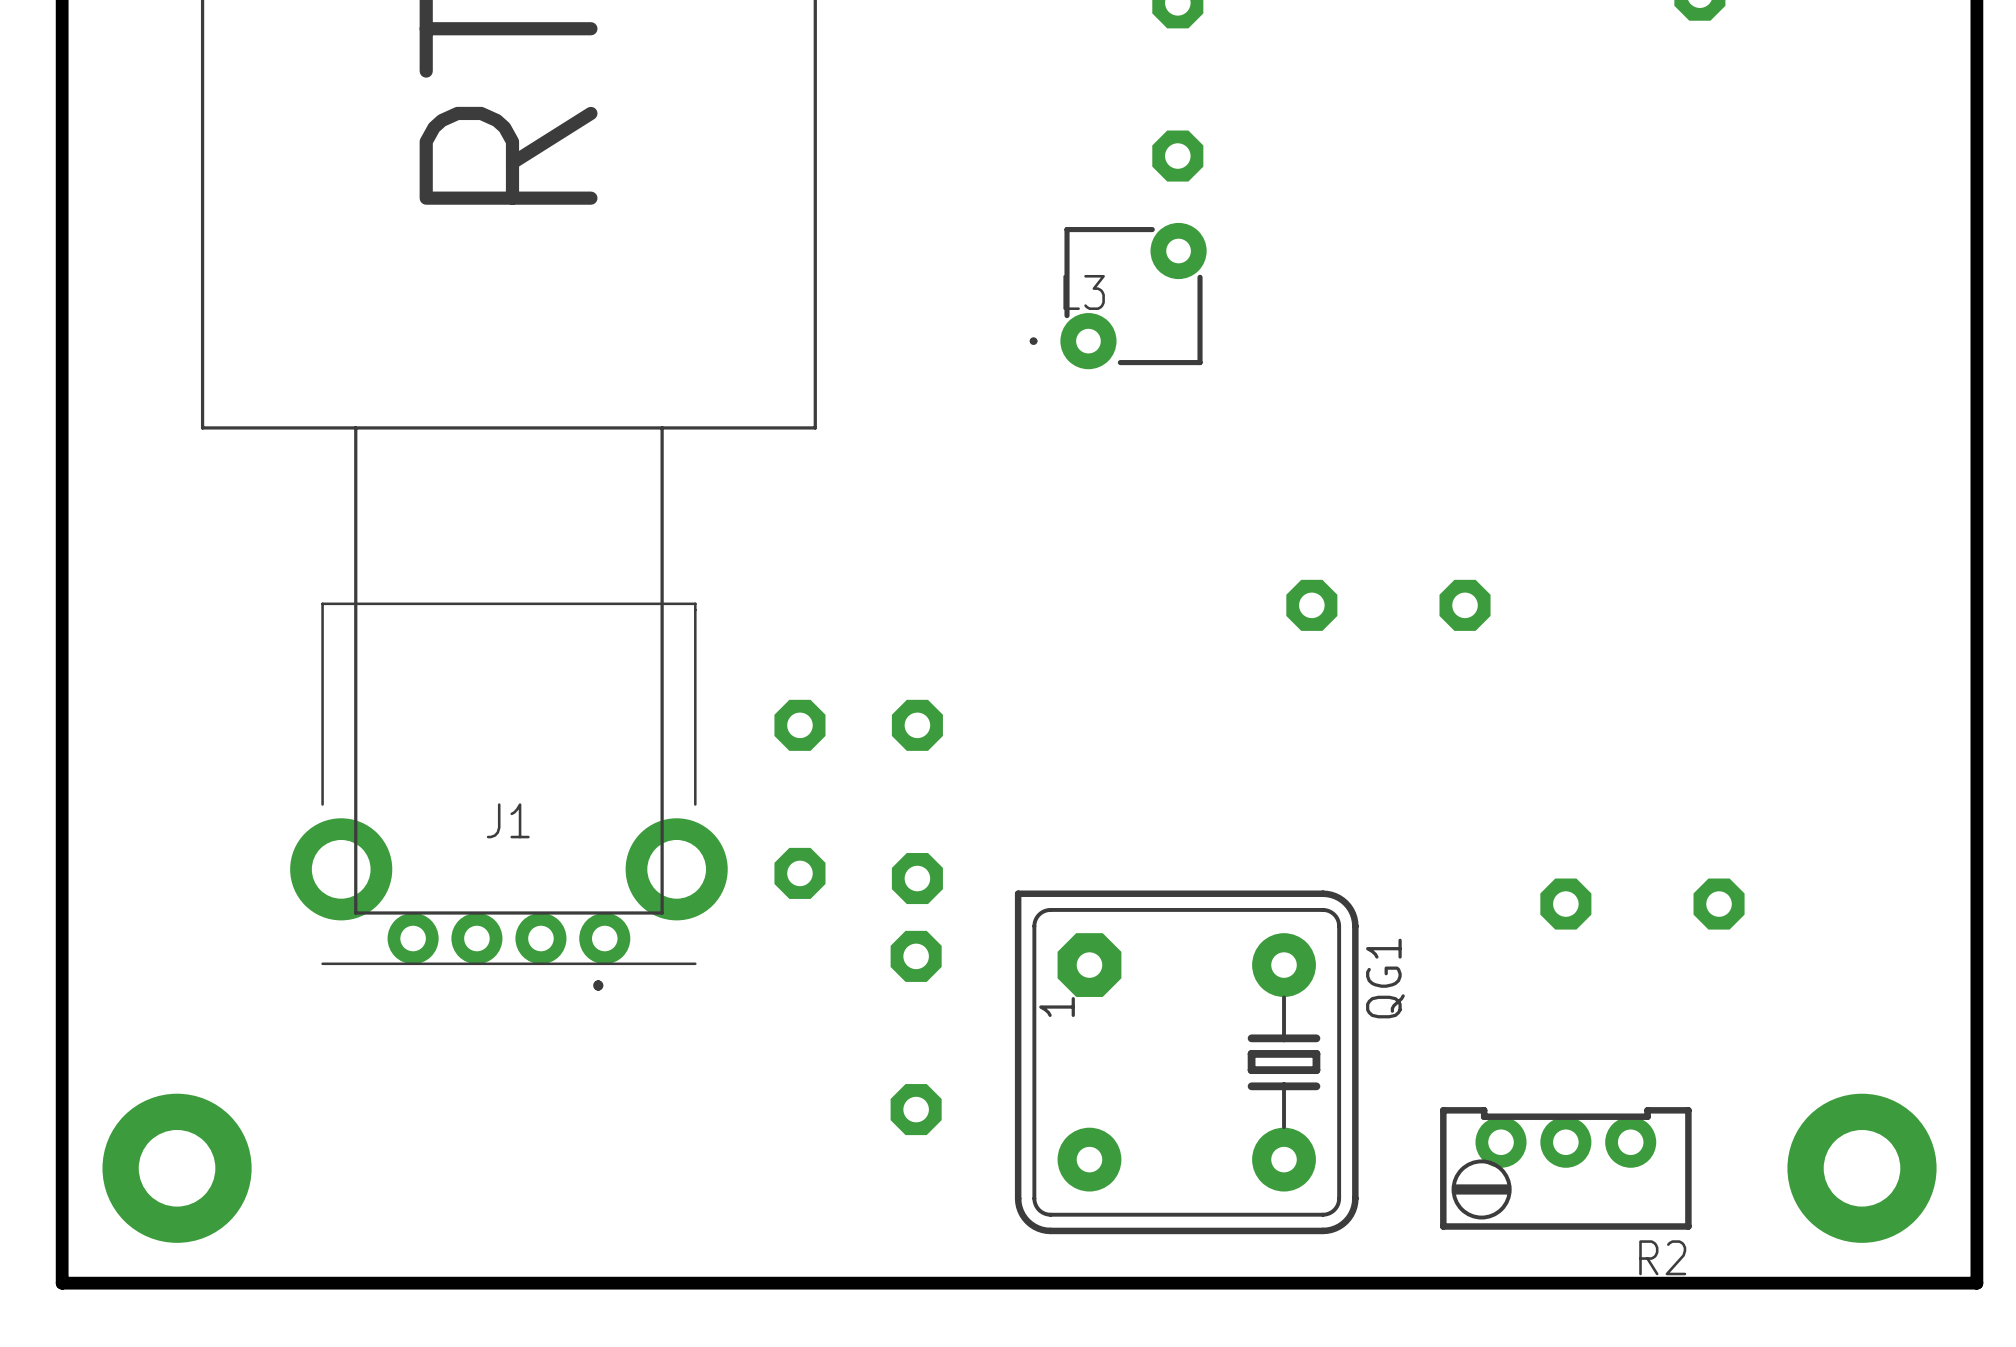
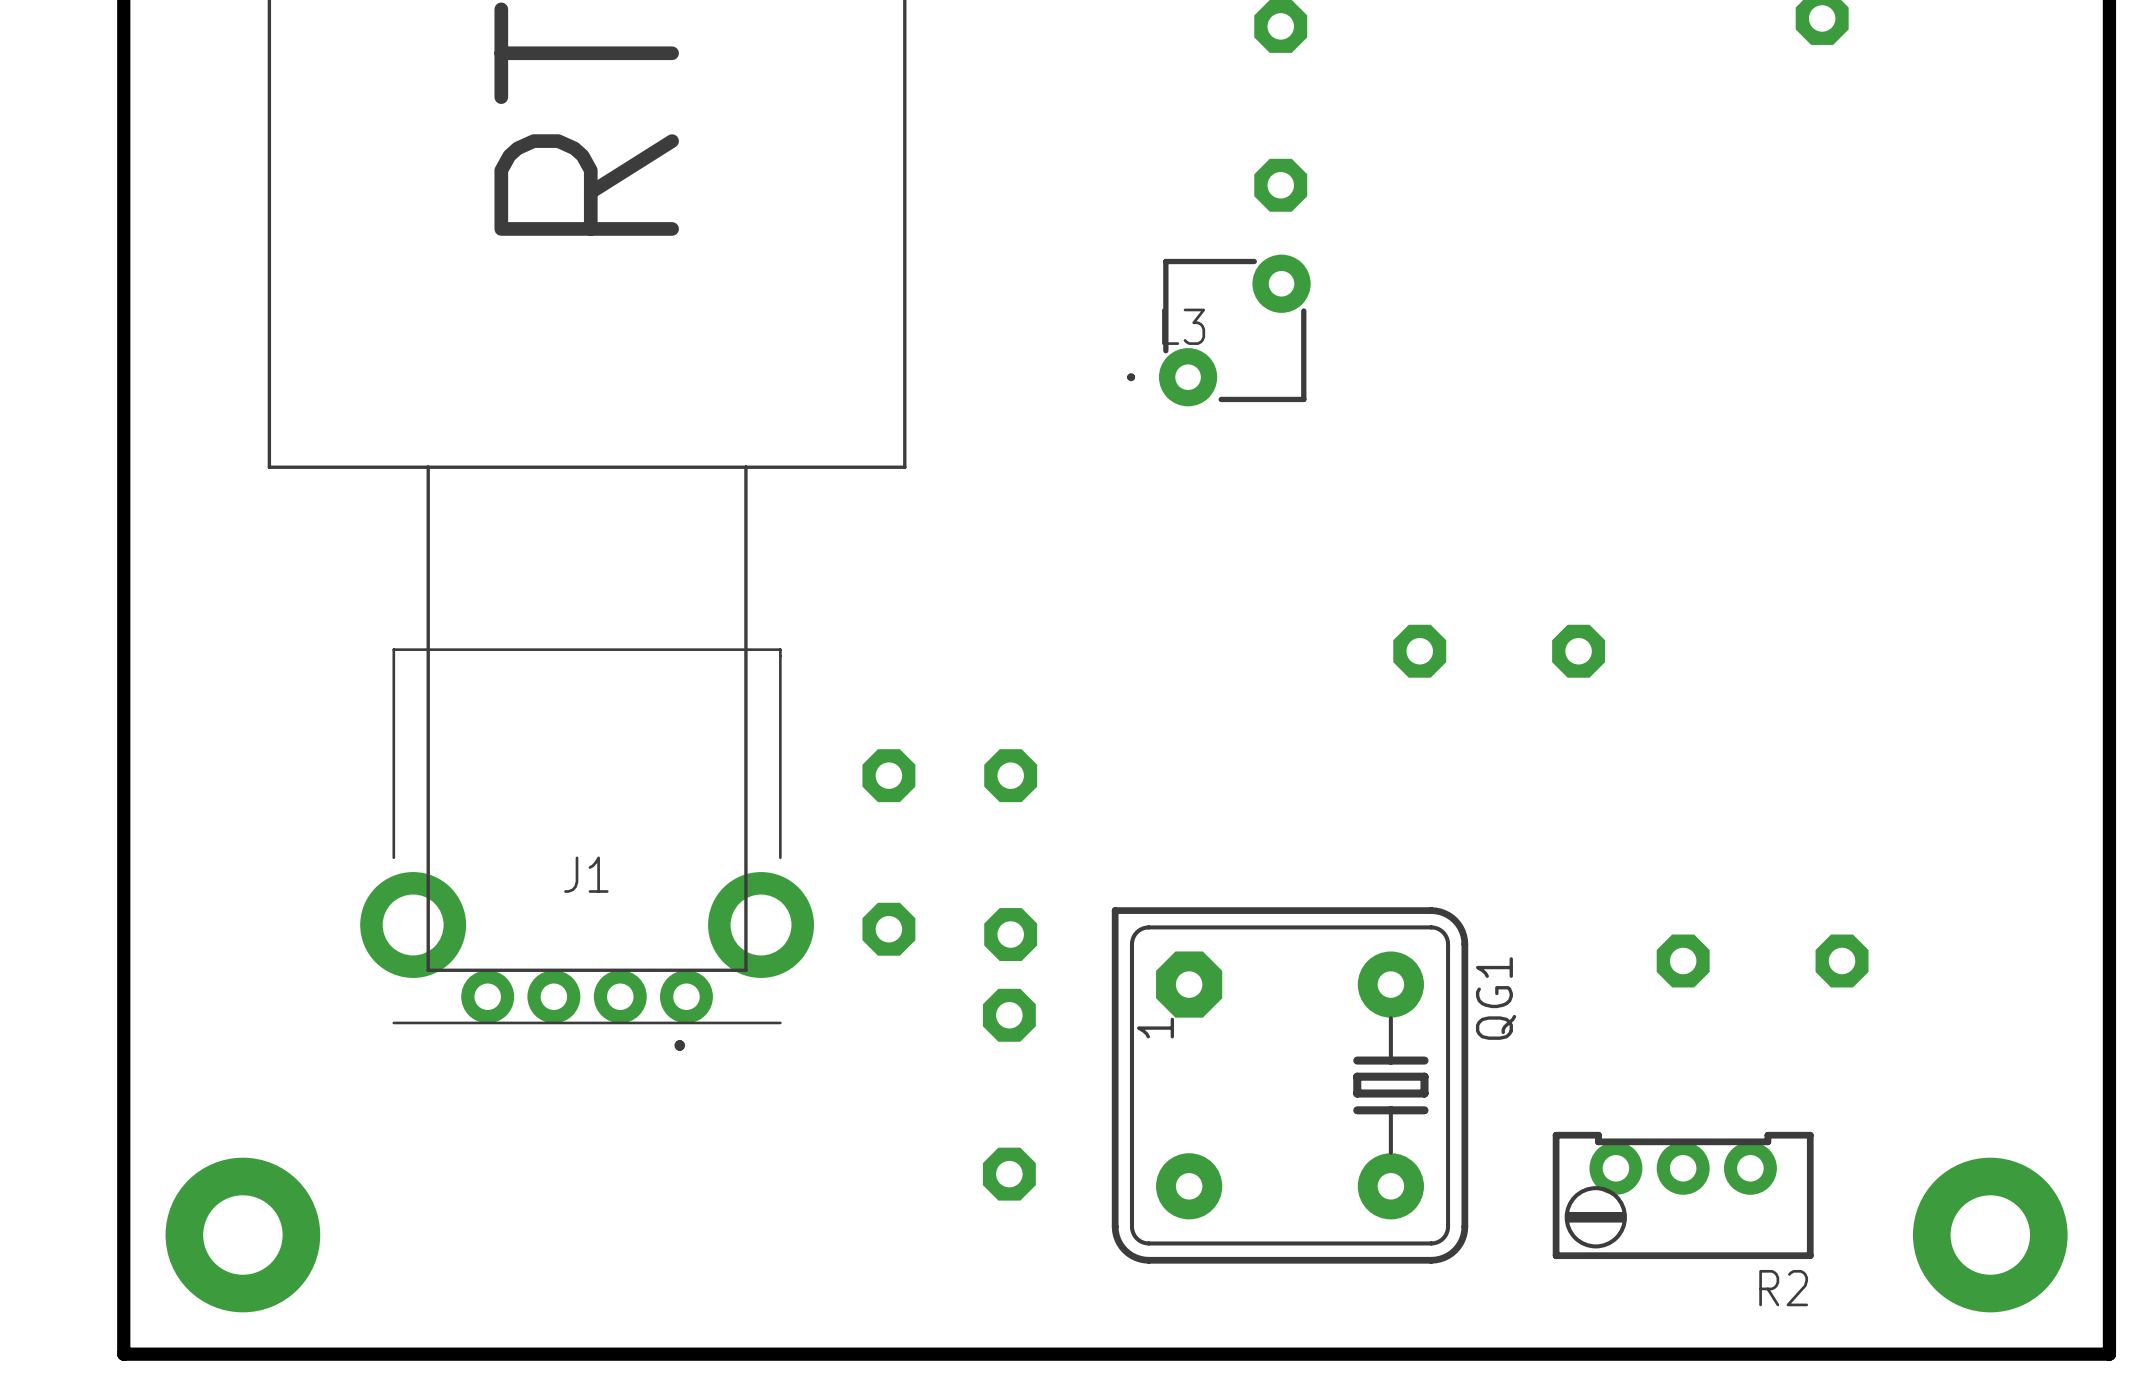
QG1 position: (1186, 1062) -> (1290, 1085)
R2 position: (1565, 1168) -> (1683, 1195)

